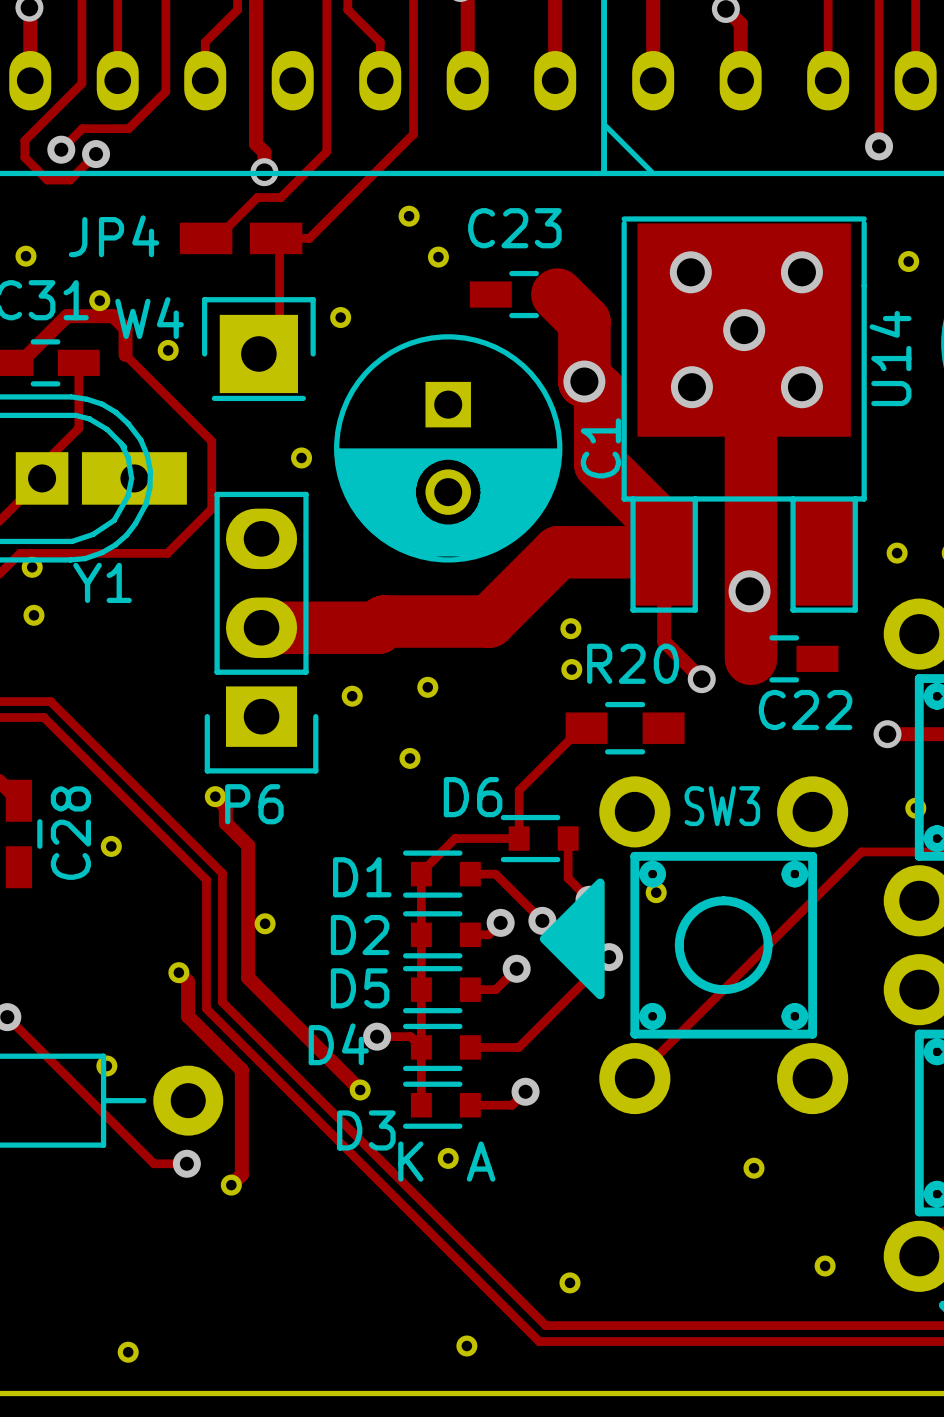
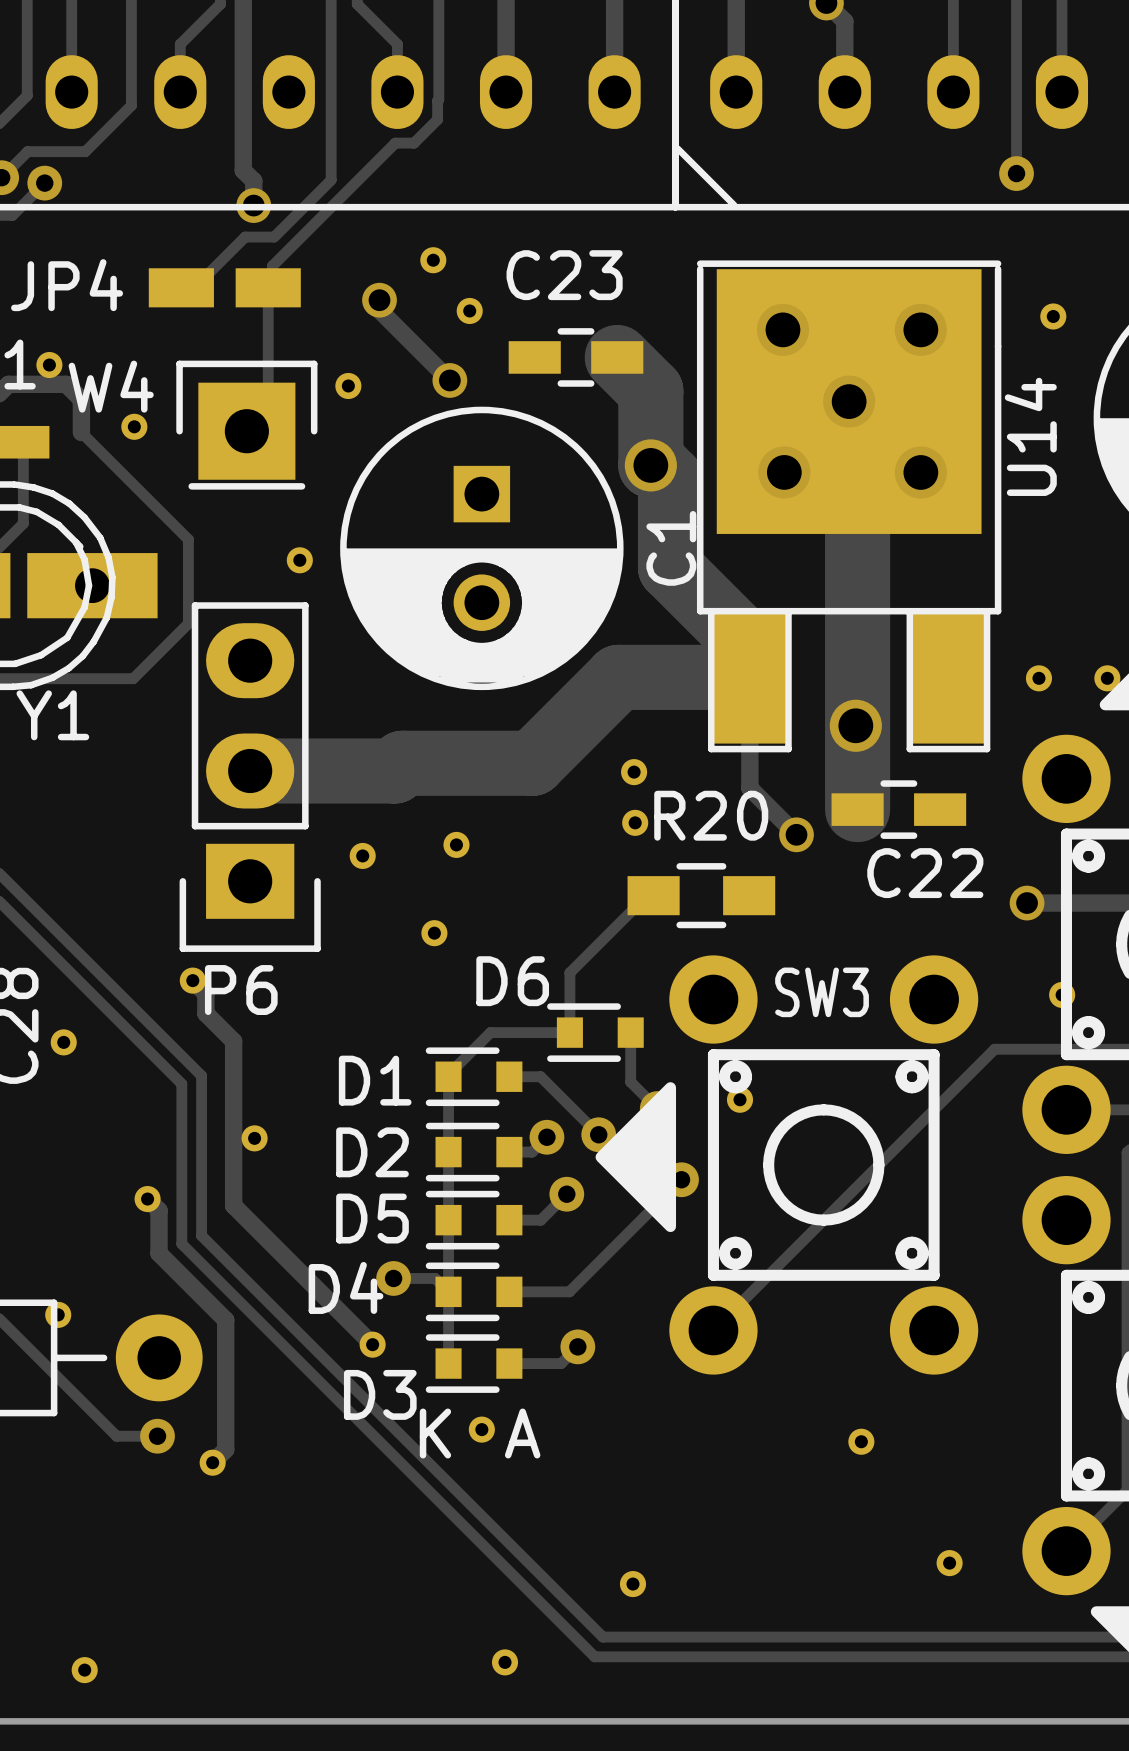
track: (413, 86) (413, 134) (309, 238) (279, 238) (279, 333) -> (438, 99) (437, 119) (414, 143) (395, 143) (272, 265) (272, 283) (268, 287) (268, 409)
track: none -> (379, 300) (379, 310) (449, 380)
via: none -> (379, 300)
via: none -> (449, 380)

